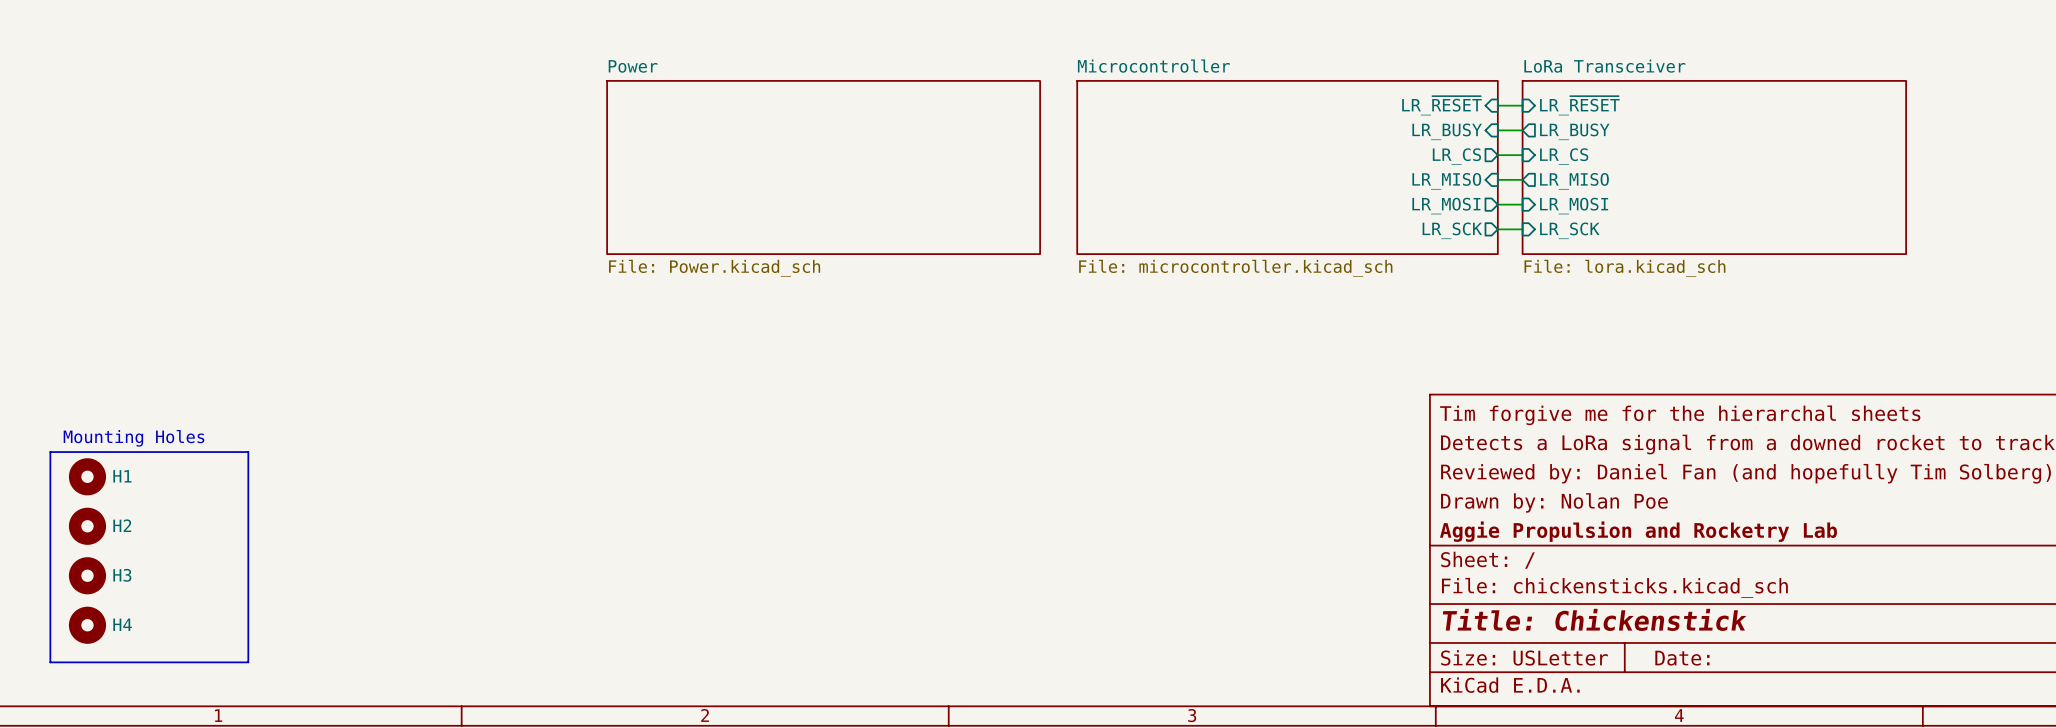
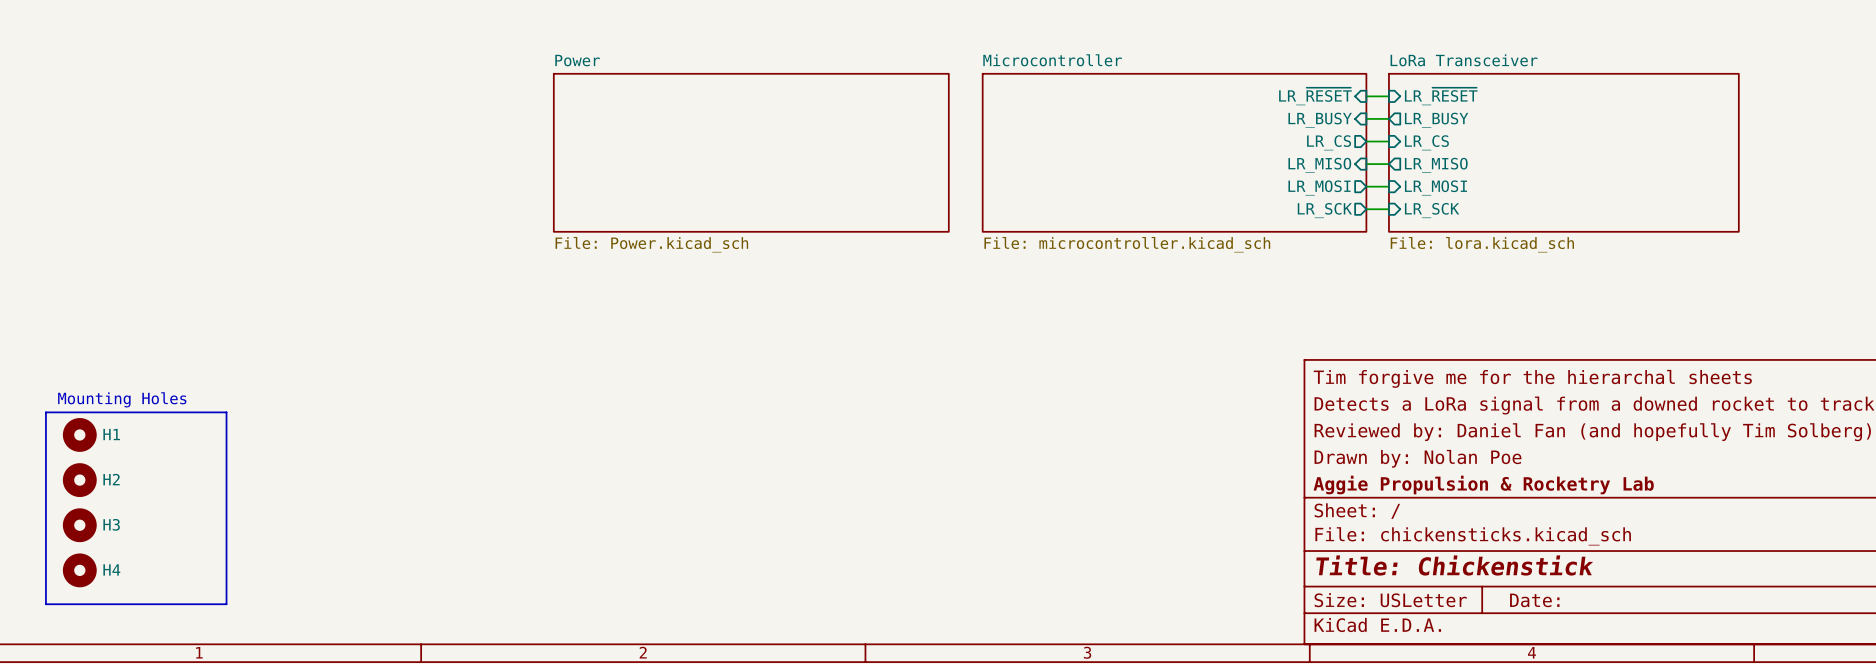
title block: Aggie Propulsion and Rocketry Lab (1638, 531) -> Aggie Propulsion & Rocketry Lab (1483, 485)

